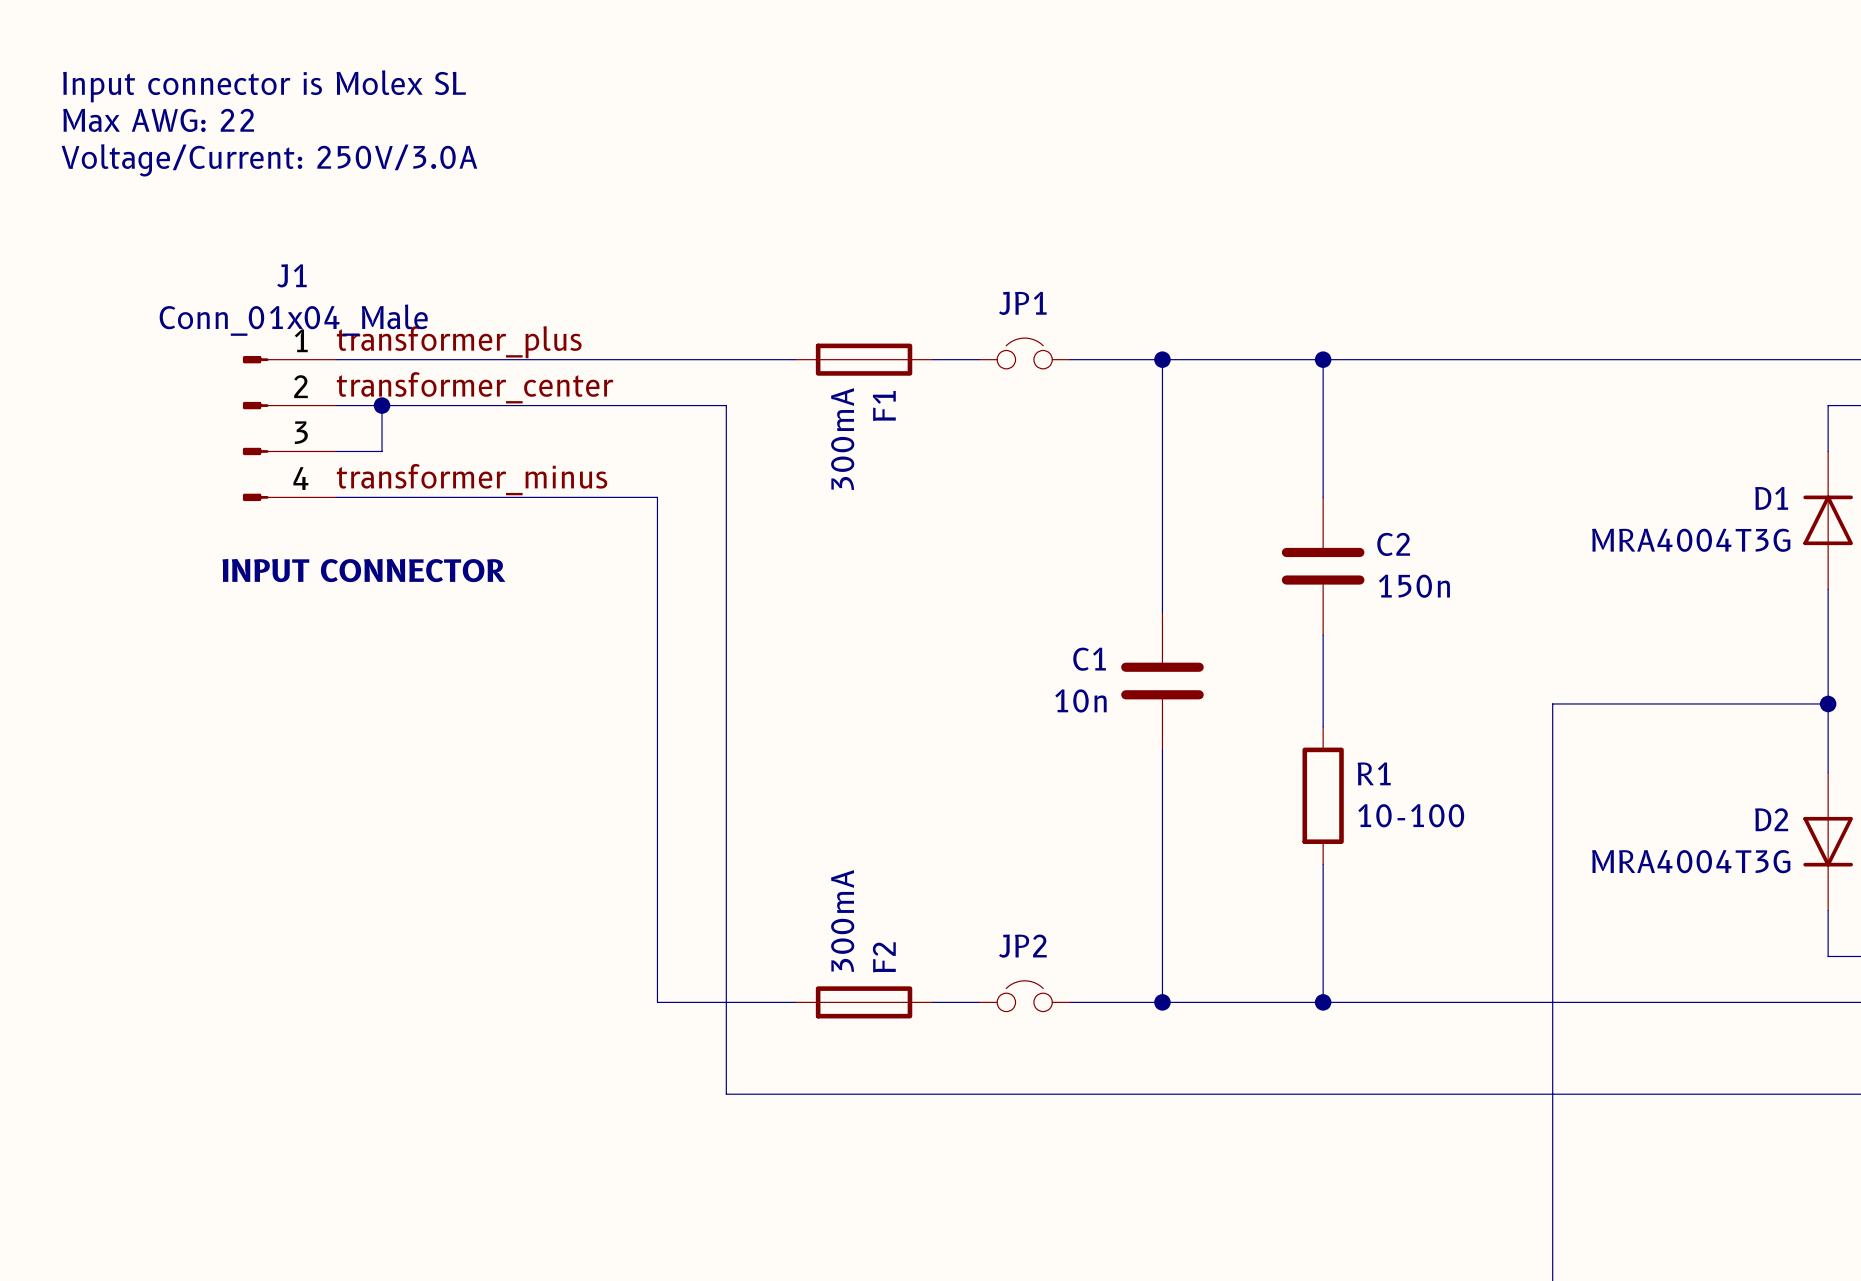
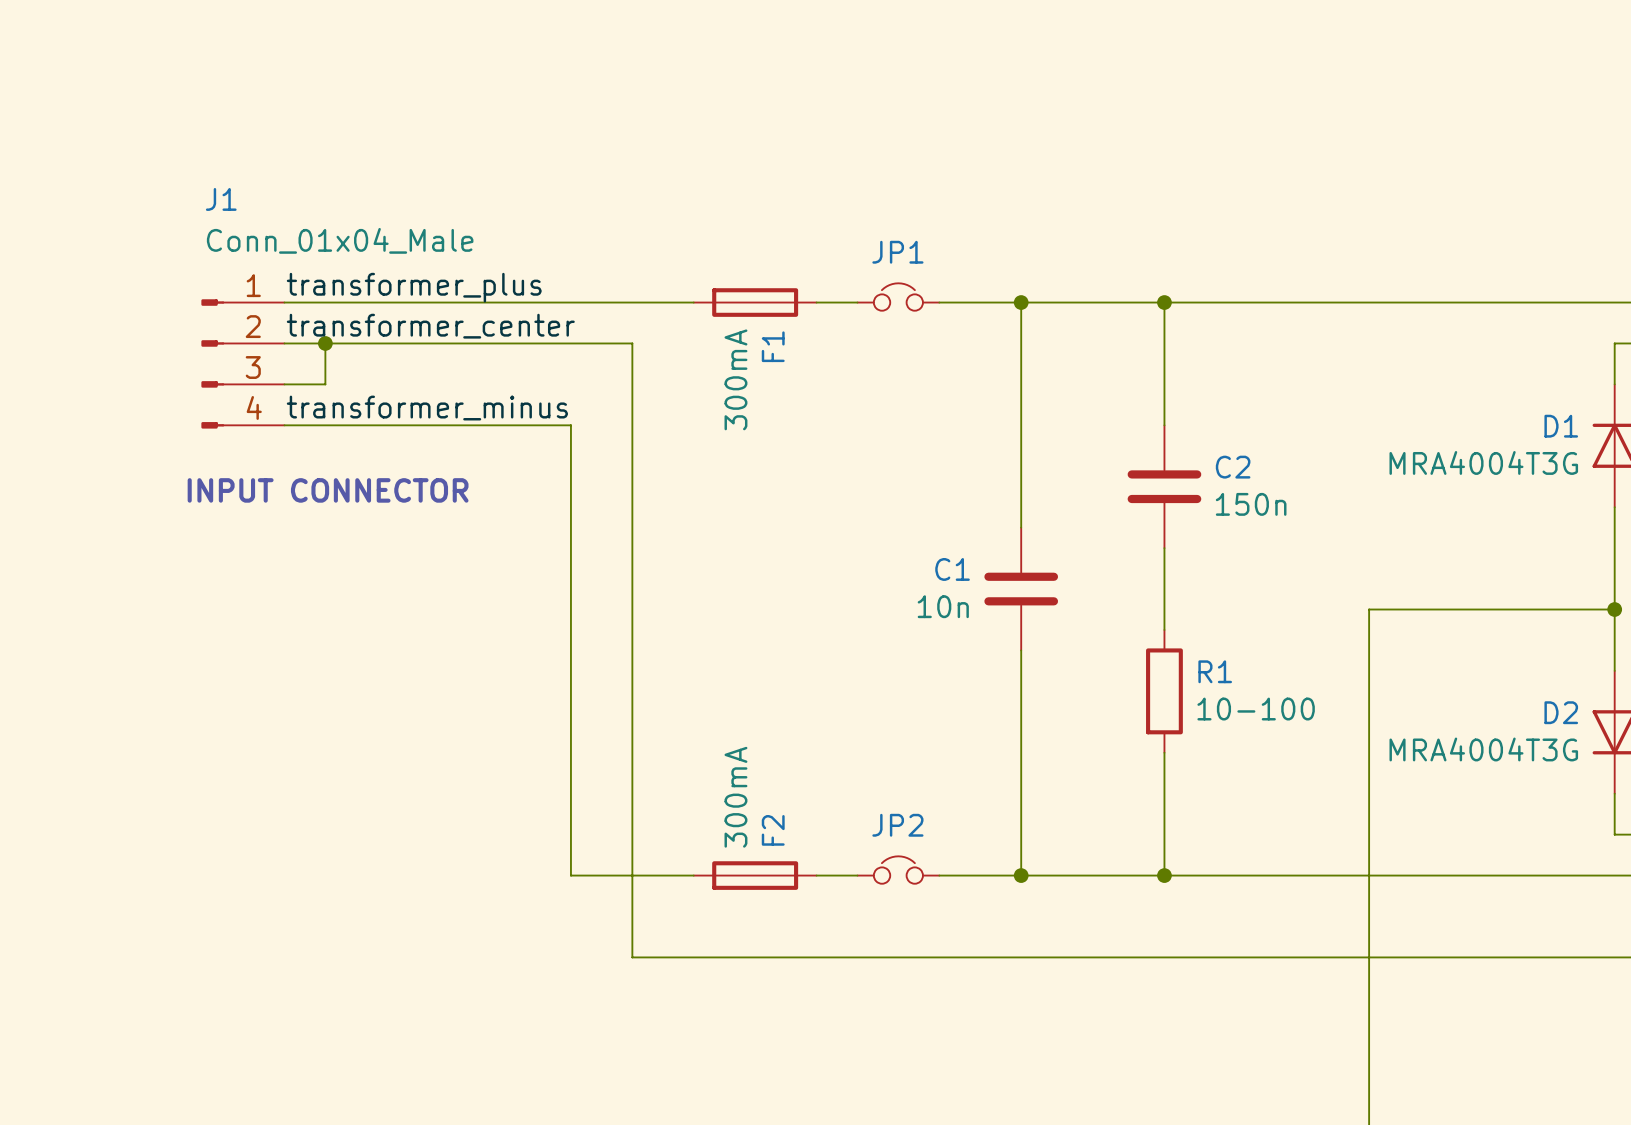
text: Input connector is Molex SL (264, 86) -> none
text: Max AWG: 22 (158, 120) -> none
text: Voltage/Current: 250V/3.0A (269, 160) -> none
J1 name position: J1 (291, 275) -> J1 (221, 199)
J1 value position: Conn_01x04_Male (293, 320) -> Conn_01x04_Male (340, 240)

